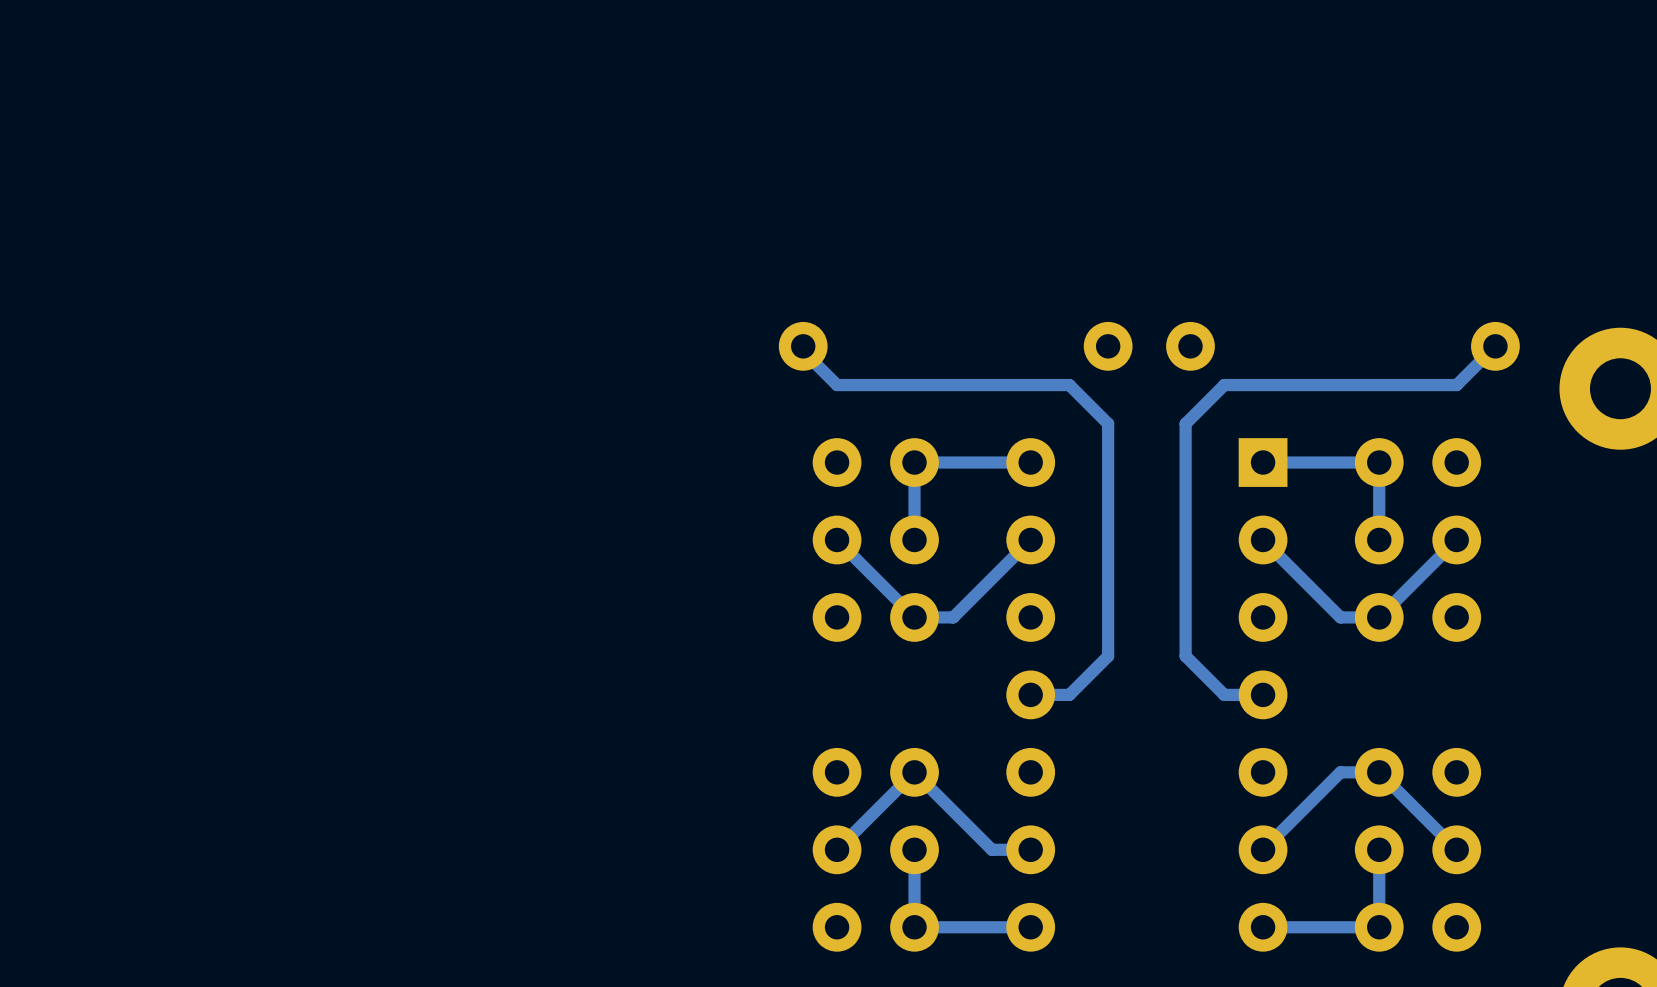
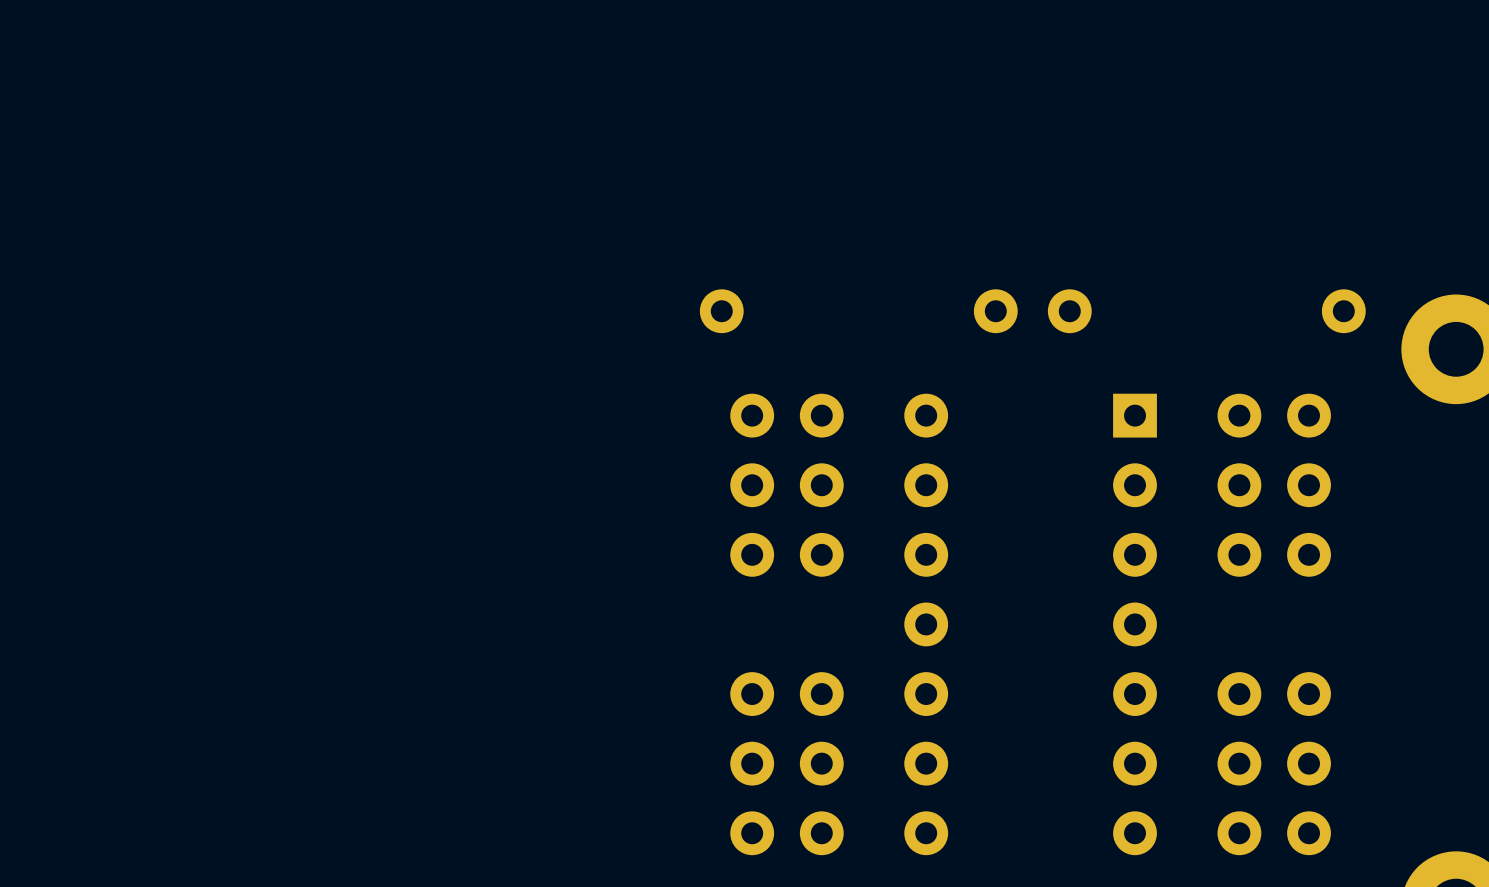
bottom track: (803, 346) (803, 351) (837, 385) (1069, 385) (1108, 423) (1108, 656) (1069, 694) (1030, 694) -> none
bottom track: (1495, 346) (1456, 385) (1224, 385) (1185, 423) (1185, 656) (1224, 694) (1263, 694) -> none
bottom track: (1030, 462) (914, 462) (914, 539) -> none
bottom track: (1263, 462) (1379, 462) (1379, 539) -> none
bottom track: (1030, 539) (953, 617) (914, 617) (837, 539) -> none
bottom track: (1456, 539) (1379, 617) (1340, 617) (1263, 539) -> none
bottom track: (914, 849) (914, 927) (1030, 927) -> none
bottom track: (1030, 849) (991, 849) (914, 772) (837, 849) -> none
bottom track: (1379, 849) (1379, 927) (1263, 927) -> none
bottom track: (1456, 849) (1379, 772) (1340, 772) (1263, 849) -> none

